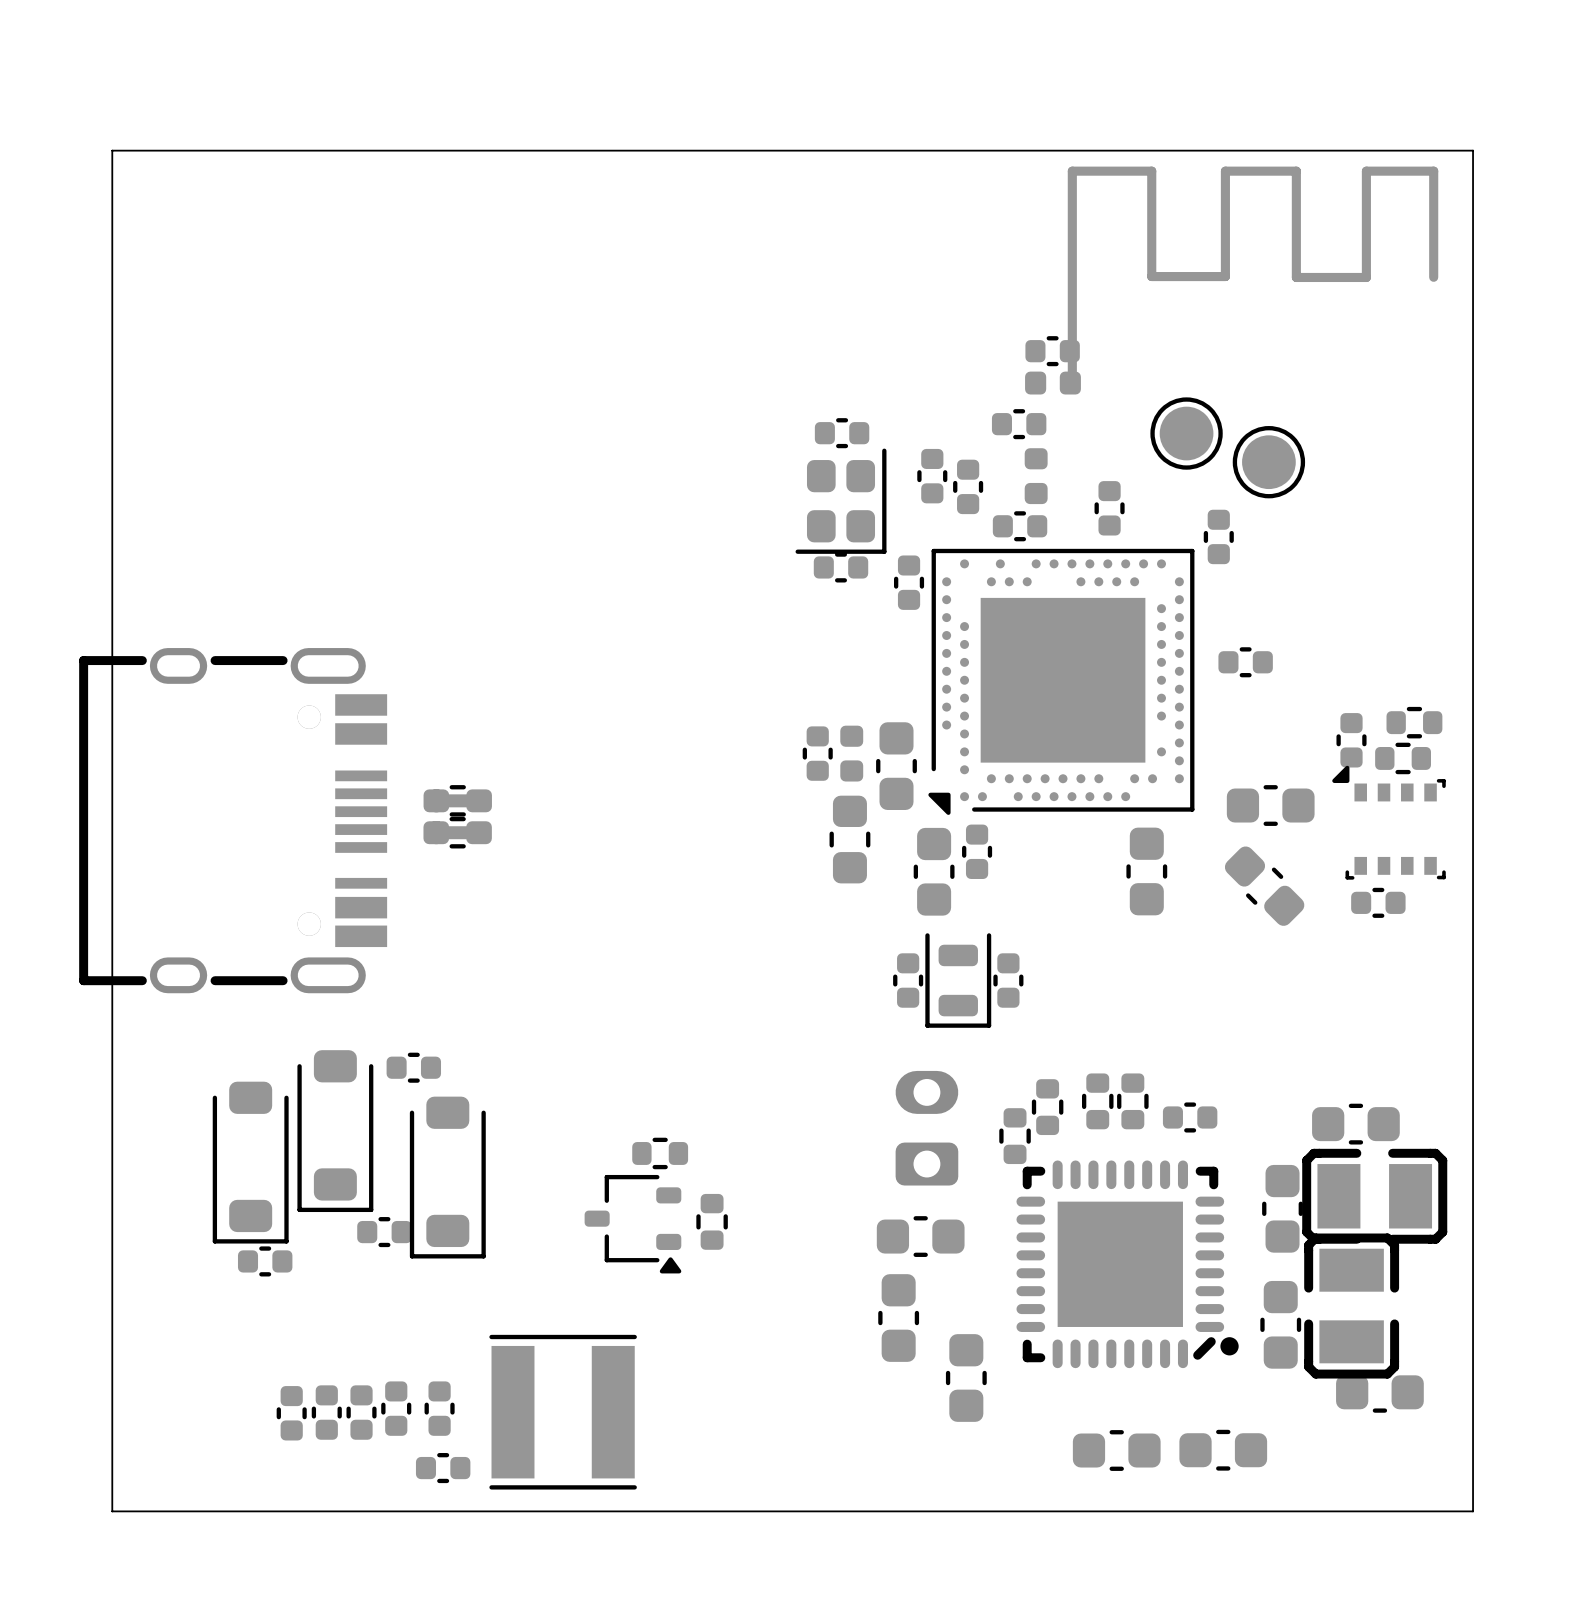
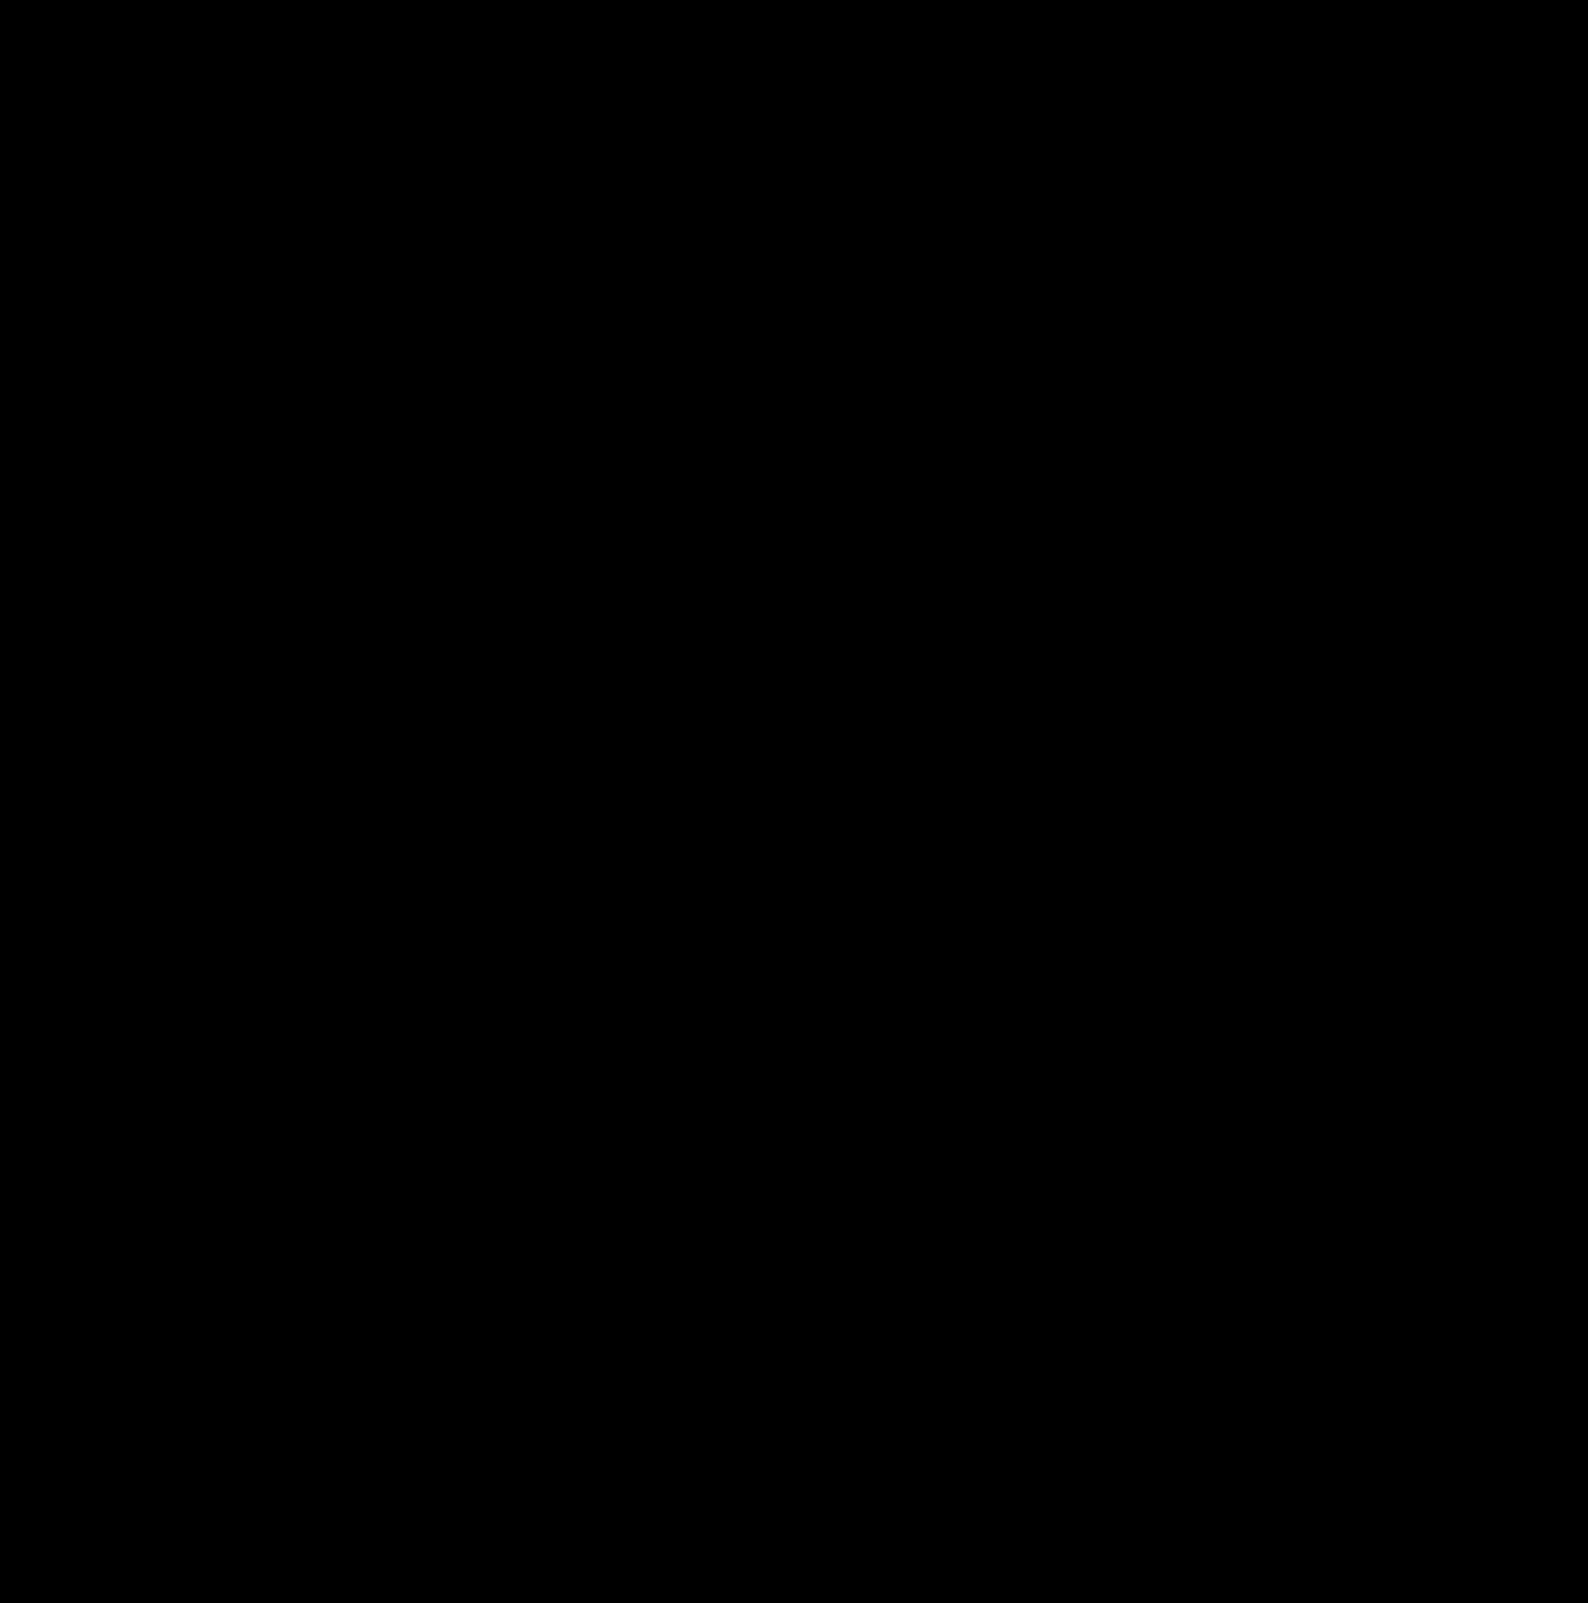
board edge: (112, 150) (1473, 150) (1473, 1511) (112, 1511) (112, 150) -> none
part: (1253, 273) -> none
part: (1052, 351) -> none
part: (1052, 383) -> none
part: (1019, 424) -> none
part: (842, 433) -> none
part: (1186, 433) -> none
part: (1268, 462) -> none
part: (932, 476) -> none
part: (1036, 476) -> none
part: (968, 486) -> none
part: (841, 501) -> none
part: (1109, 508) -> none
part: (1020, 526) -> none
part: (1218, 536) -> none
part: (841, 567) -> none
part: (909, 582) -> none
part: (1245, 662) -> none
part: (1061, 681) -> none
part: (1414, 722) -> none
part: (1351, 740) -> none
part: (817, 753) -> none
part: (851, 753) -> none
part: (1403, 758) -> none
part: (896, 766) -> none
part: (457, 800) -> none
part: (1270, 805) -> none
part: (233, 820) -> none
part: (1389, 822) -> none
part: (457, 832) -> none
part: (849, 839) -> none
part: (977, 851) -> none
part: (934, 871) -> none
part: (1146, 871) -> none
part: (1264, 886) -> none
part: (1378, 902) -> none
part: (908, 980) -> none
part: (958, 980) -> none
part: (1008, 980) -> none
part: (413, 1067) -> none
part: (1097, 1101) -> none
part: (1132, 1101) -> none
part: (1047, 1107) -> none
part: (1190, 1117) -> none
part: (1355, 1124) -> none
part: (926, 1128) -> none
part: (335, 1131) -> none
part: (1015, 1136) -> none
part: (660, 1153) -> none
part: (250, 1162) -> none
part: (447, 1177) -> none
part: (1374, 1196) -> none
part: (1282, 1208) -> none
part: (712, 1221) -> none
part: (632, 1224) -> none
part: (384, 1232) -> none
part: (920, 1236) -> none
part: (265, 1261) -> none
part: (1127, 1264) -> none
part: (1351, 1306) -> none
part: (898, 1318) -> none
part: (1280, 1324) -> none
part: (966, 1378) -> none
part: (1379, 1392) -> none
part: (396, 1408) -> none
part: (439, 1408) -> none
part: (326, 1412) -> none
part: (361, 1412) -> none
part: (563, 1412) -> none
part: (291, 1413) -> none
part: (1116, 1450) -> none
part: (1223, 1450) -> none
part: (443, 1468) -> none

